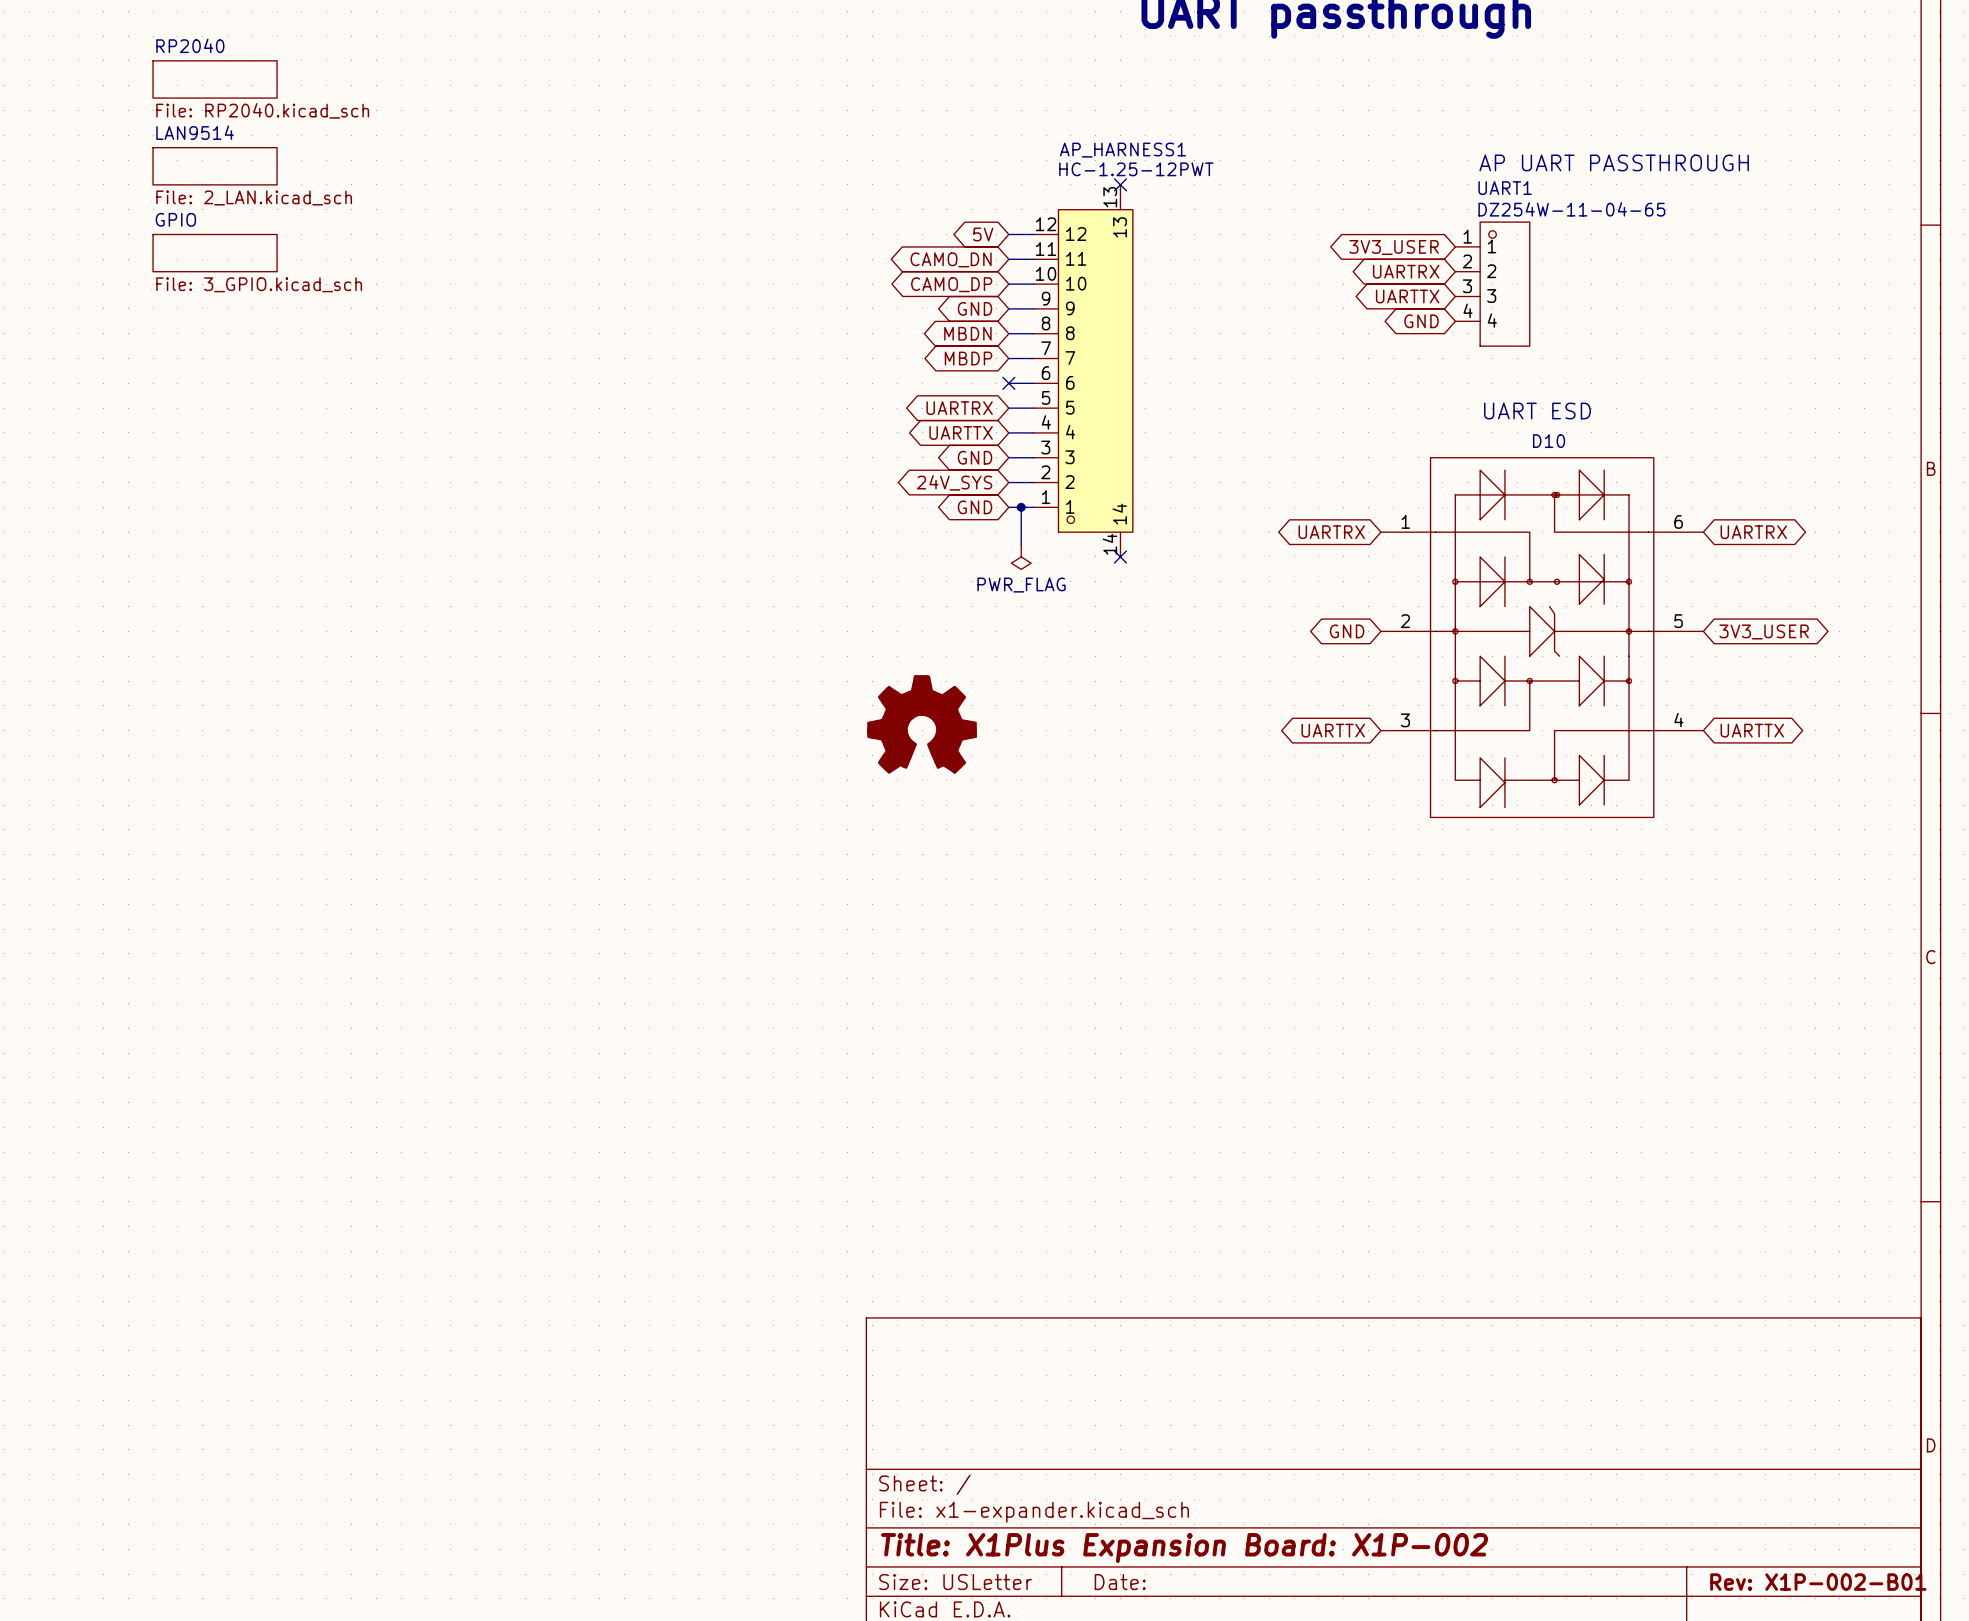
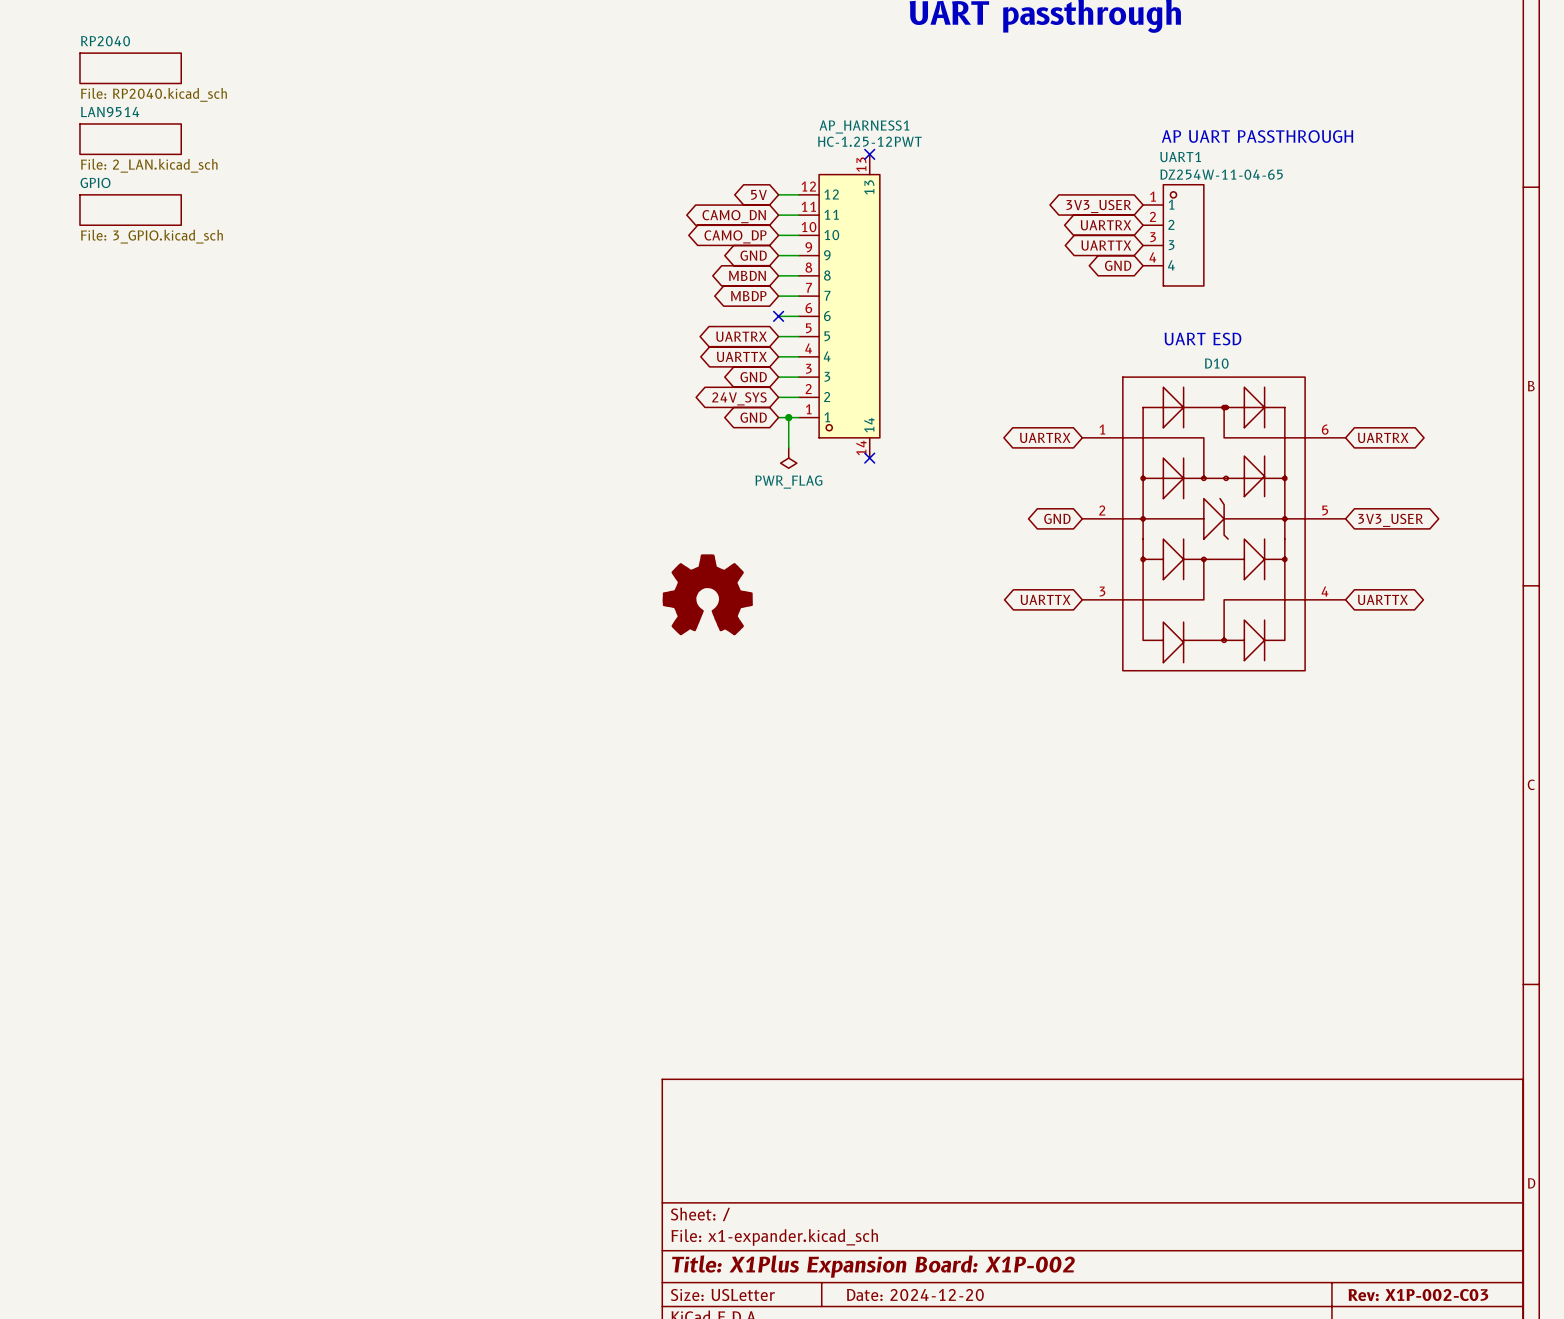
title block: Date: (1120, 1582) -> Date: 2024-12-20 (915, 1294)
title block: Rev: X1P-002-B01 (1818, 1582) -> Rev: X1P-002-C03 (1418, 1295)

